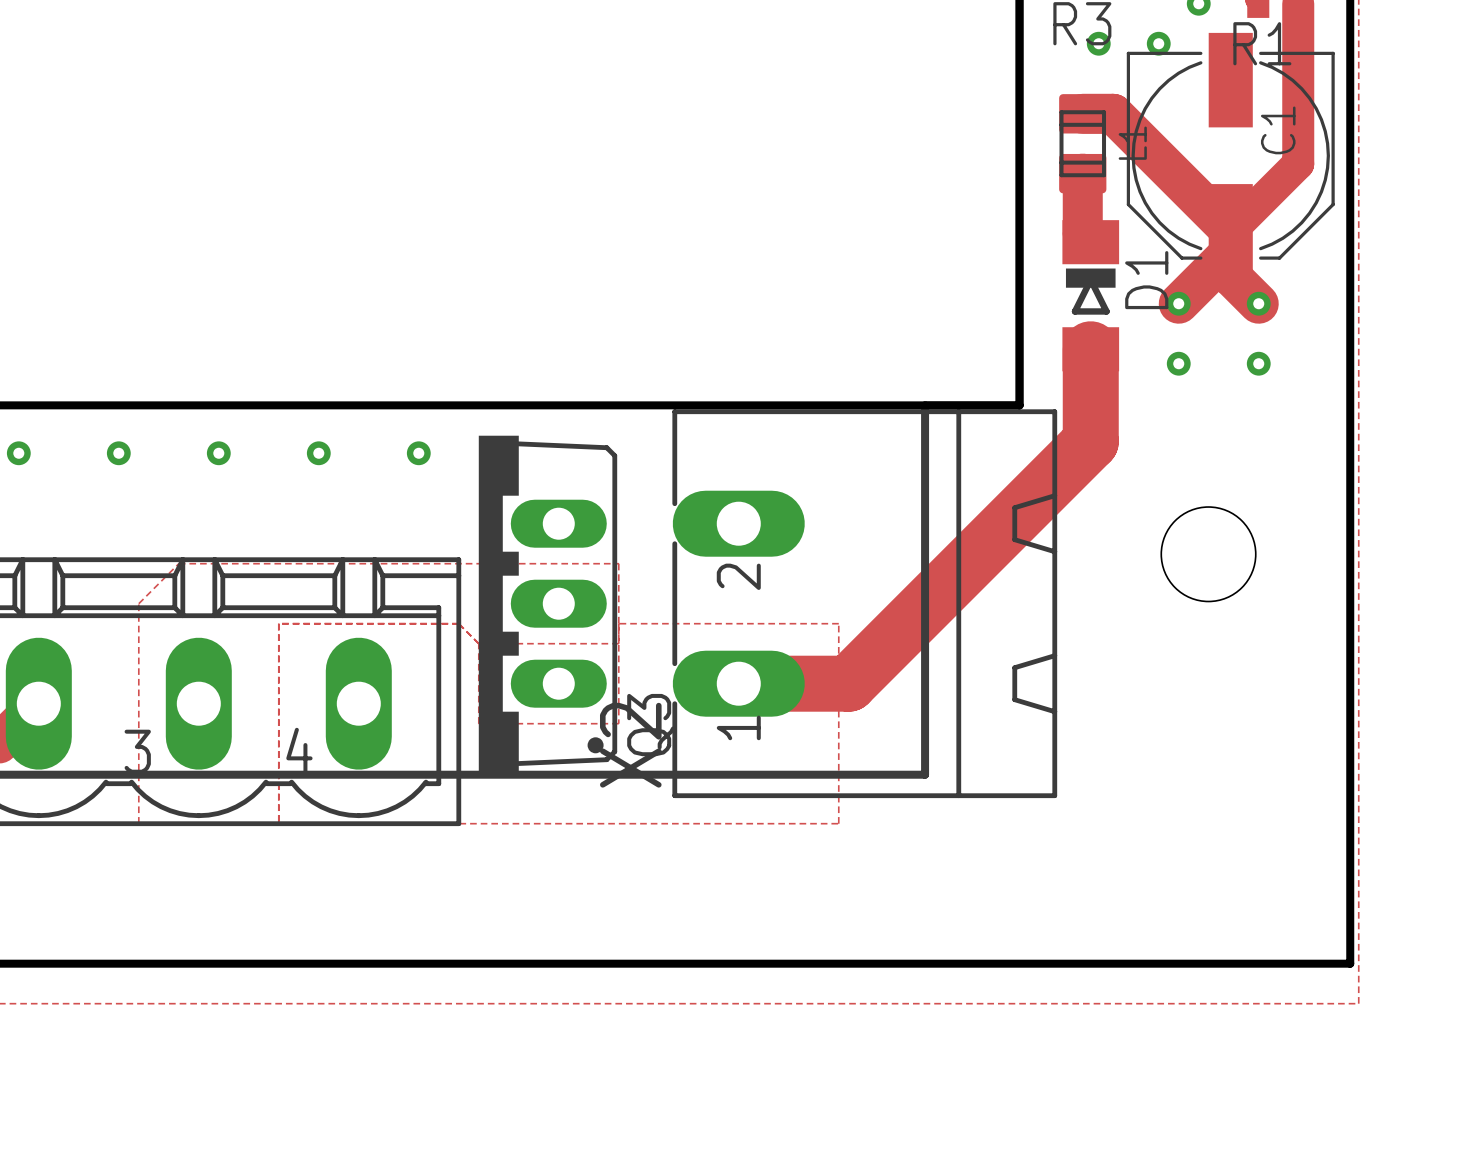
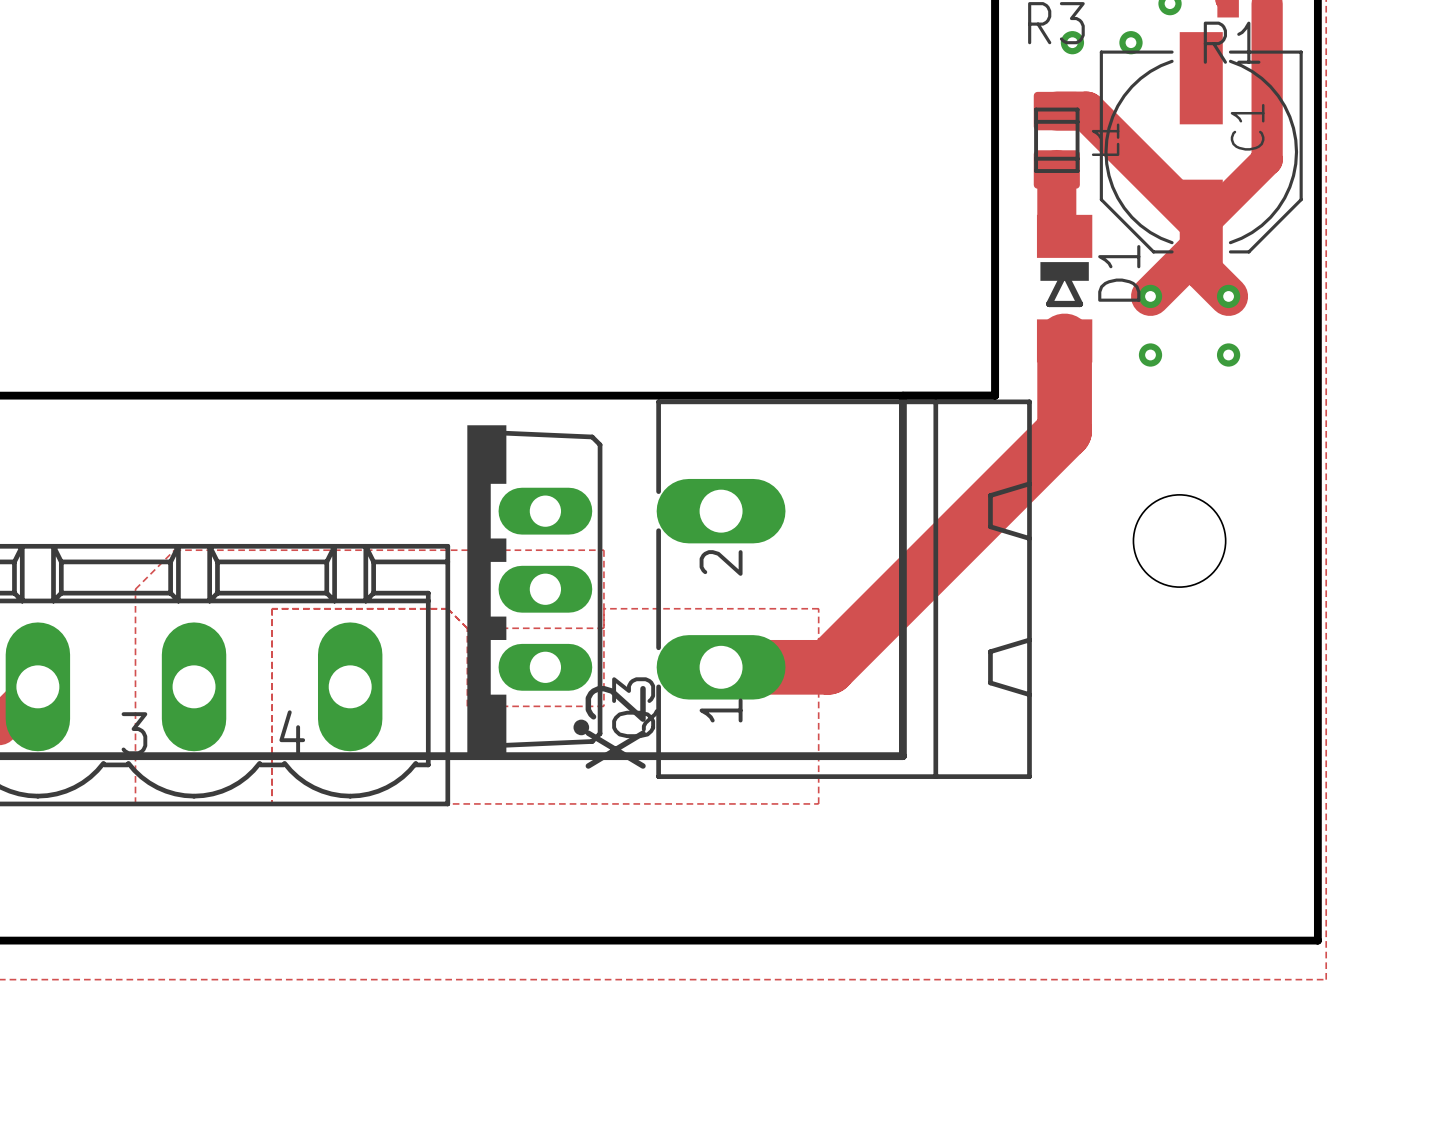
via: (18, 453) -> none
via: (118, 453) -> none
via: (218, 453) -> none
via: (318, 453) -> none
via: (418, 453) -> none

